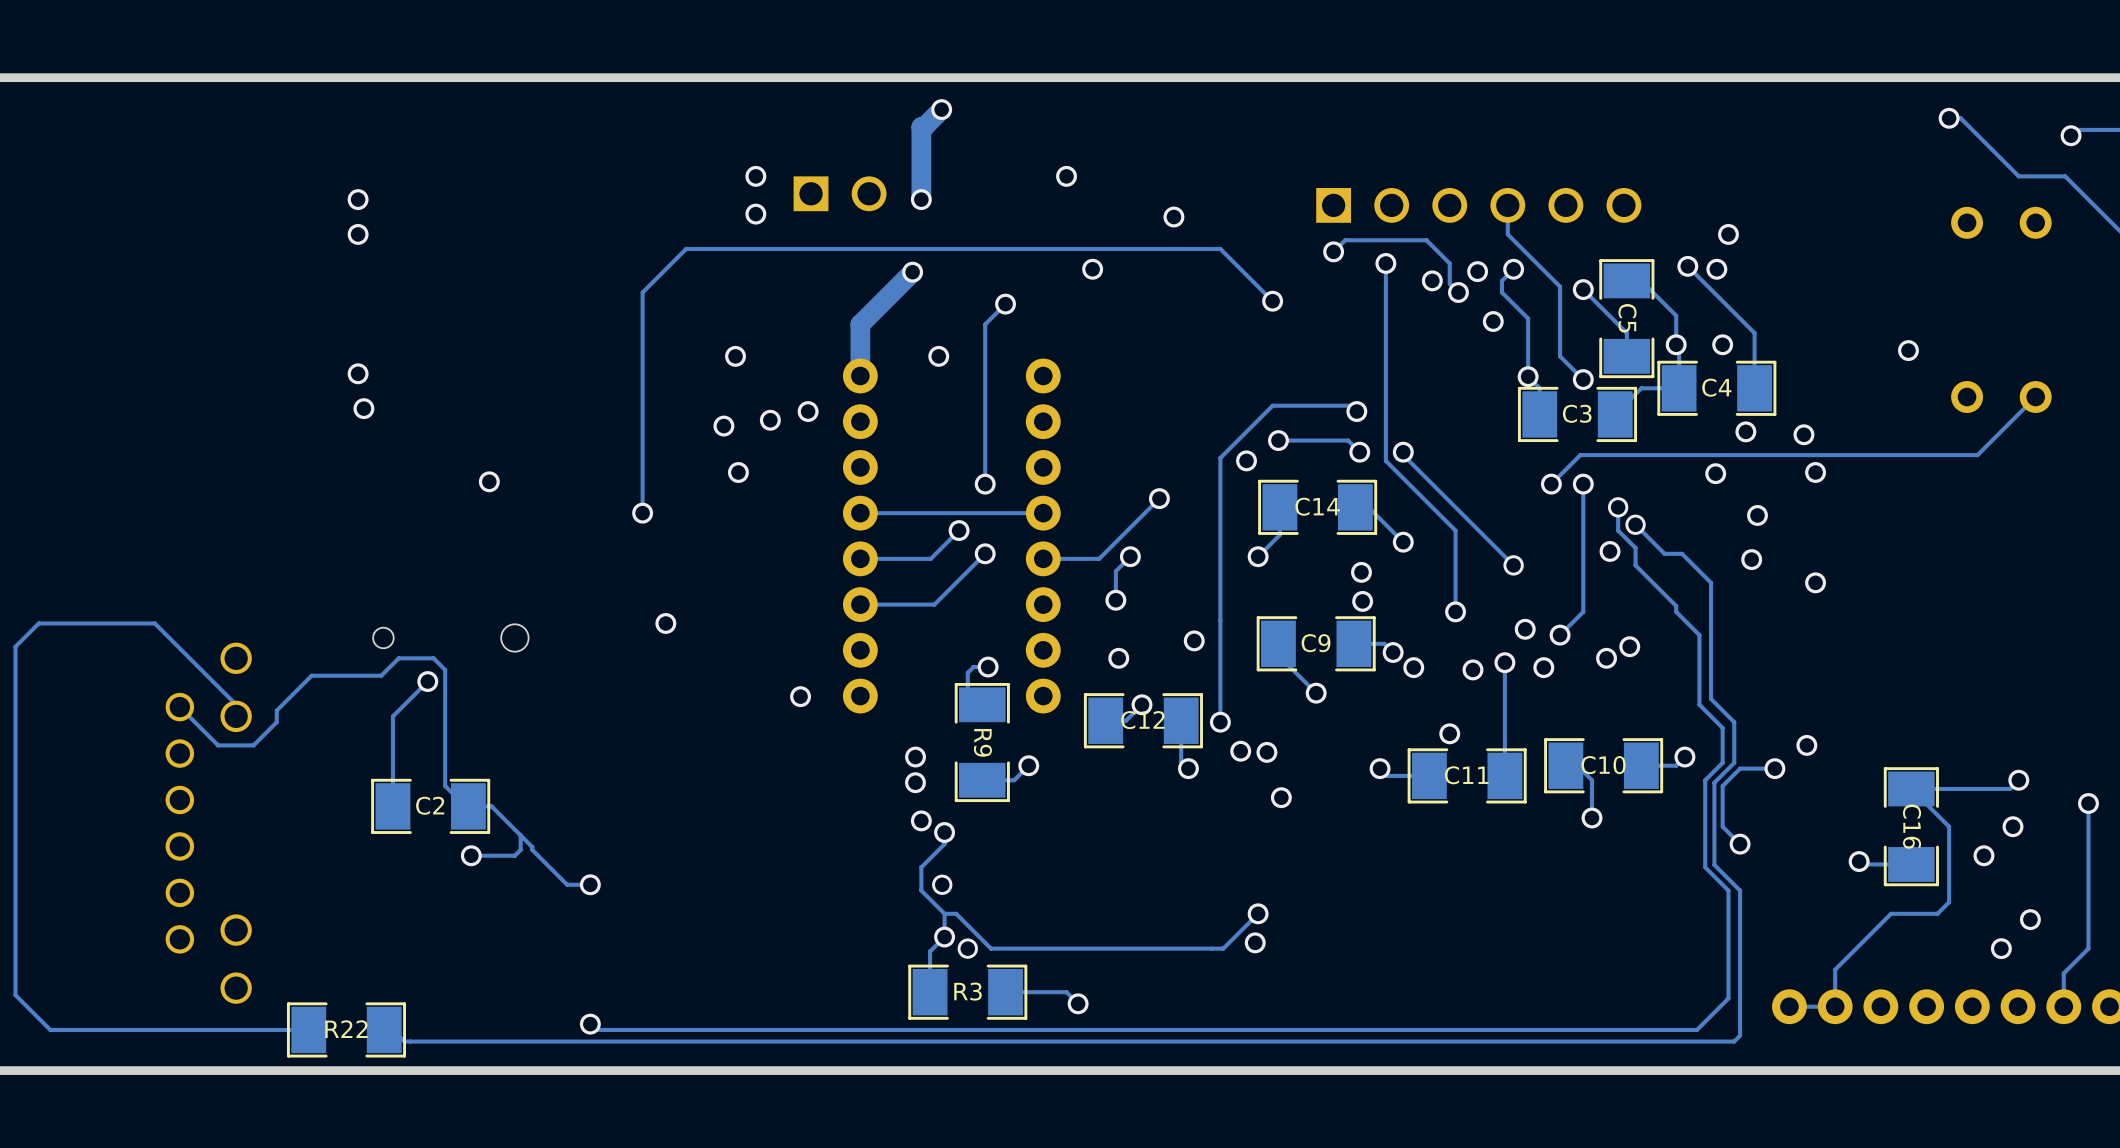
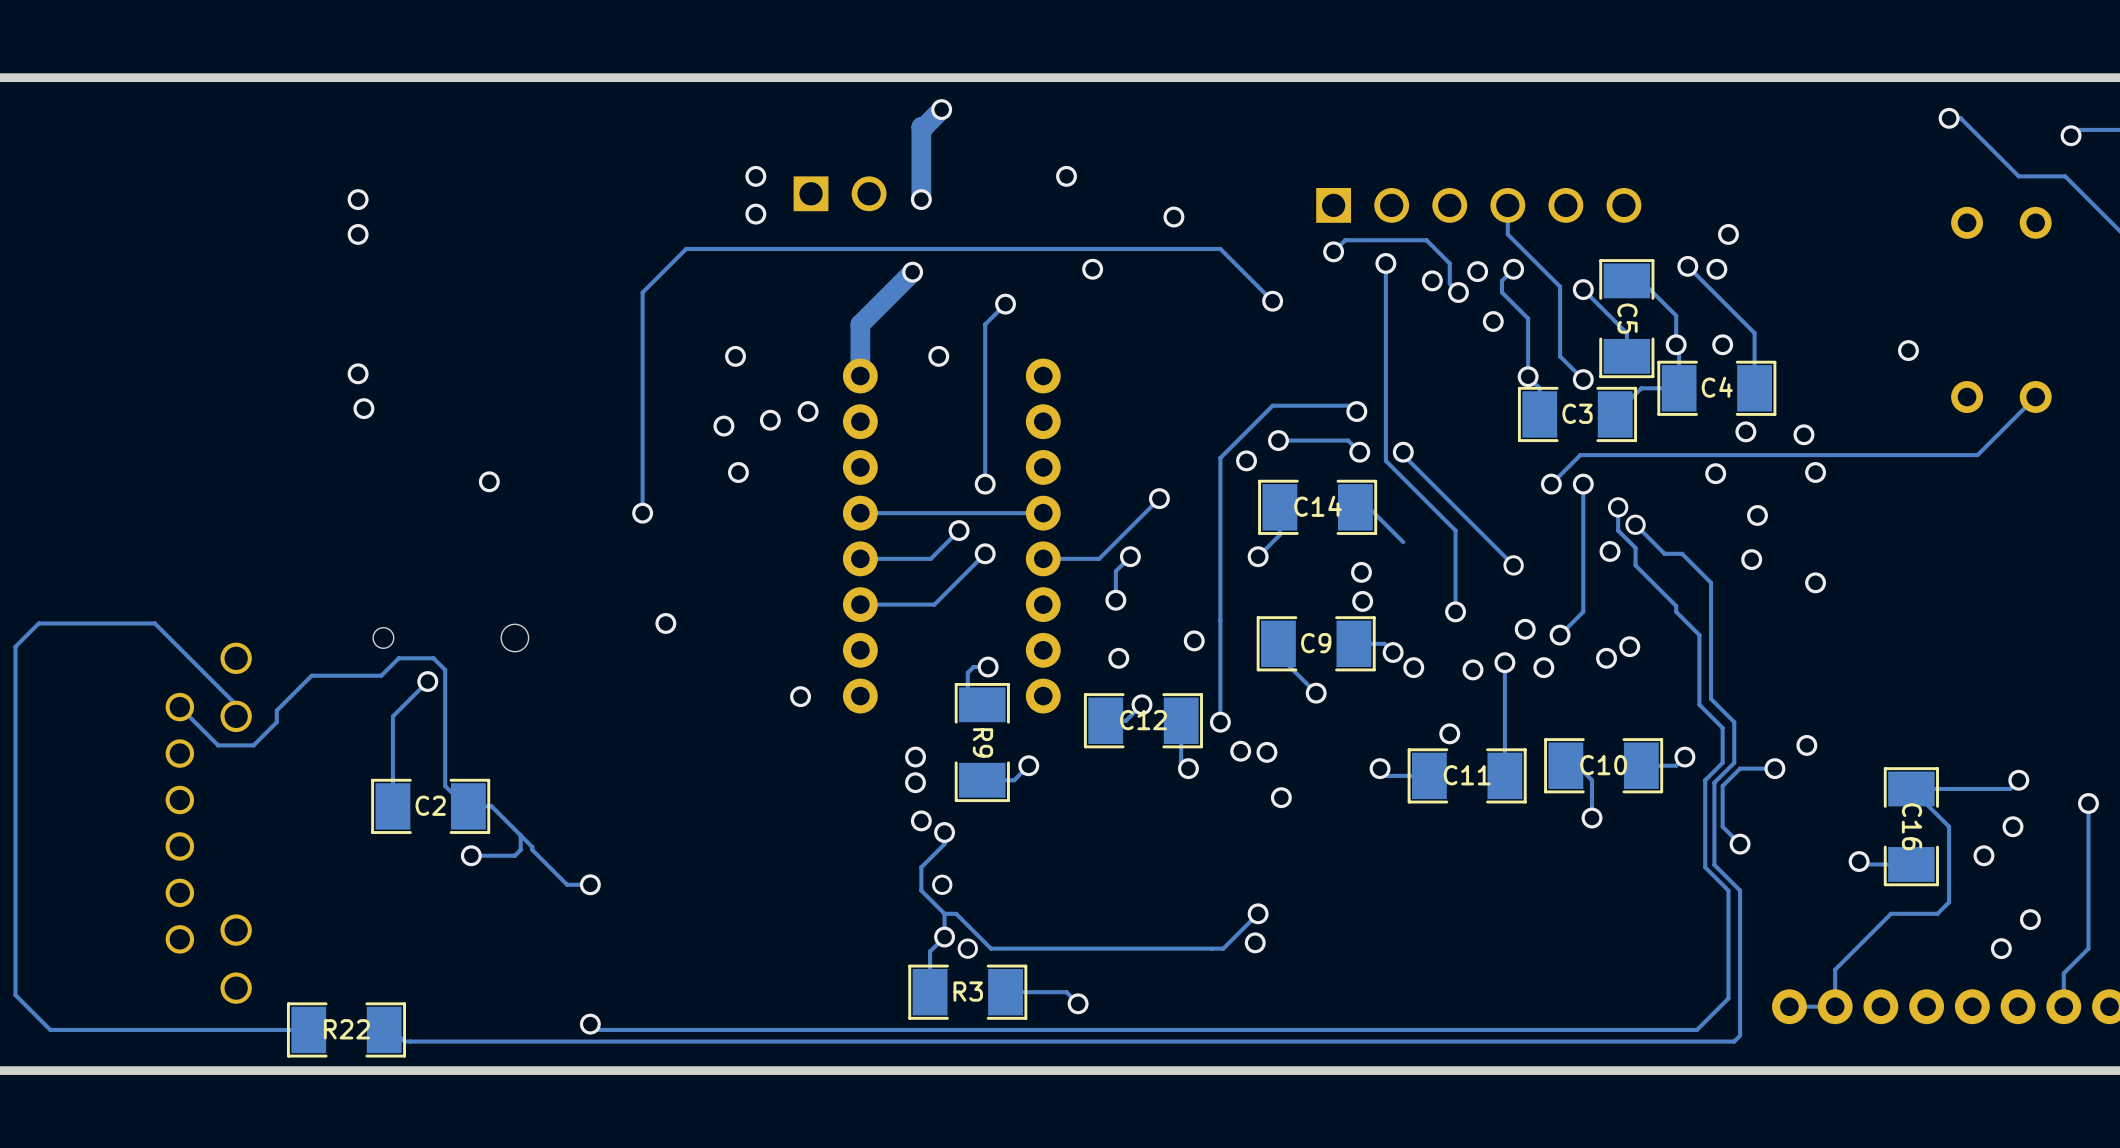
via: (1403, 542) -> none

